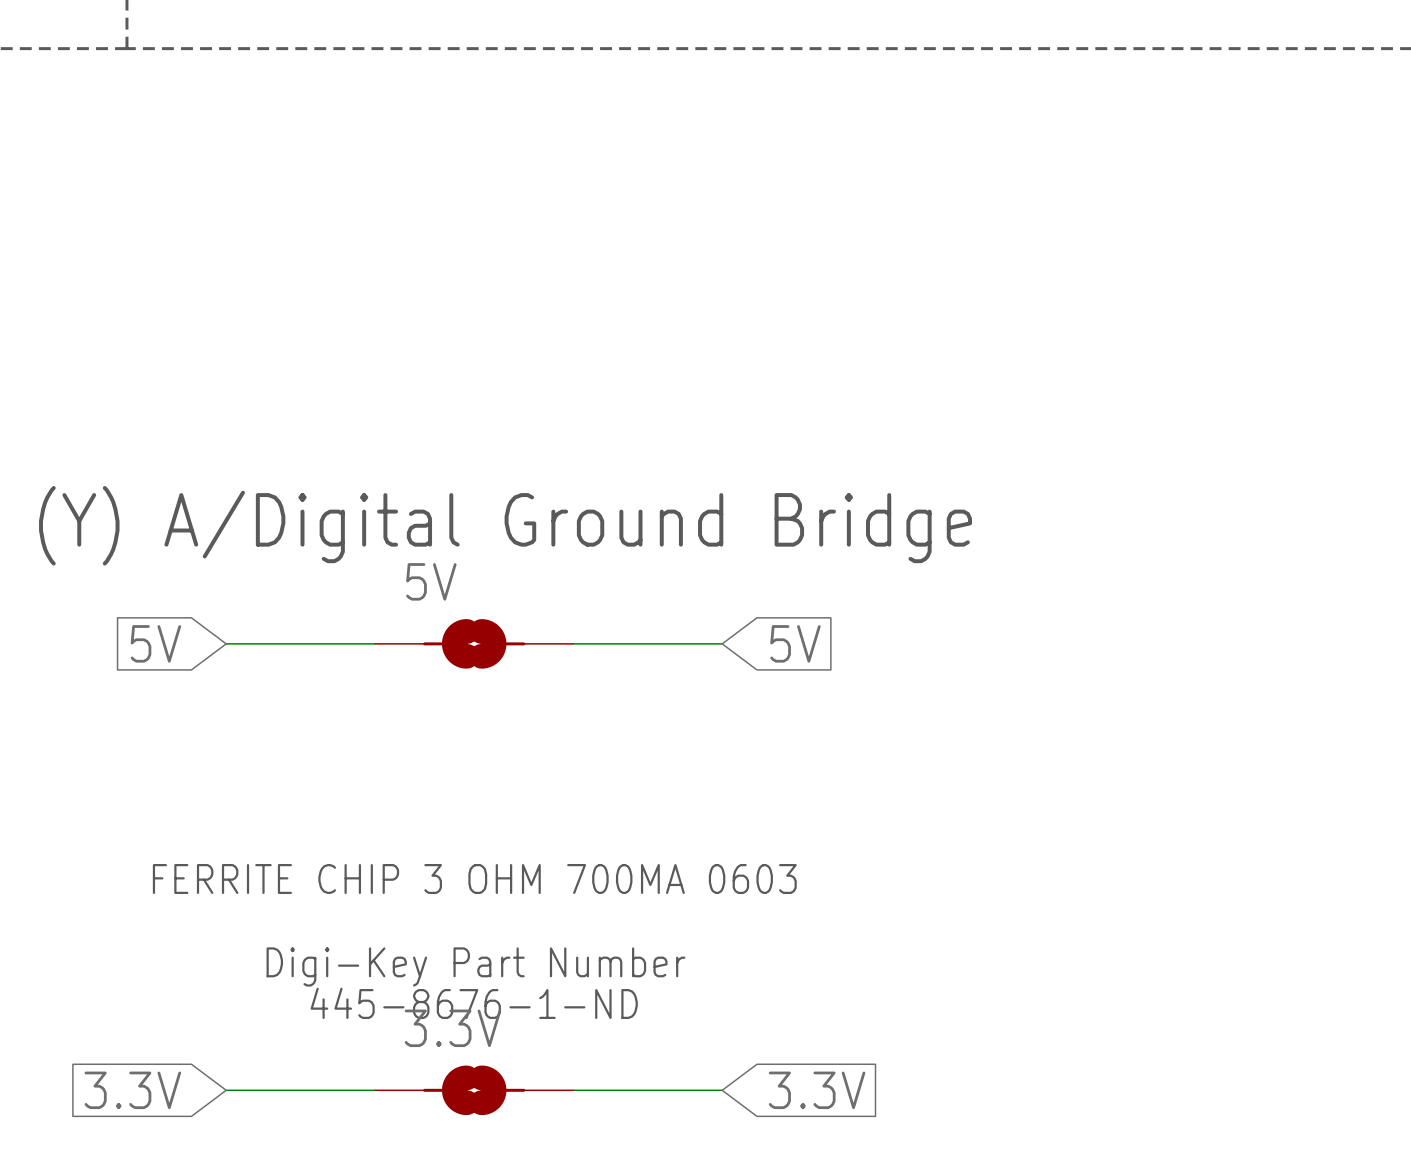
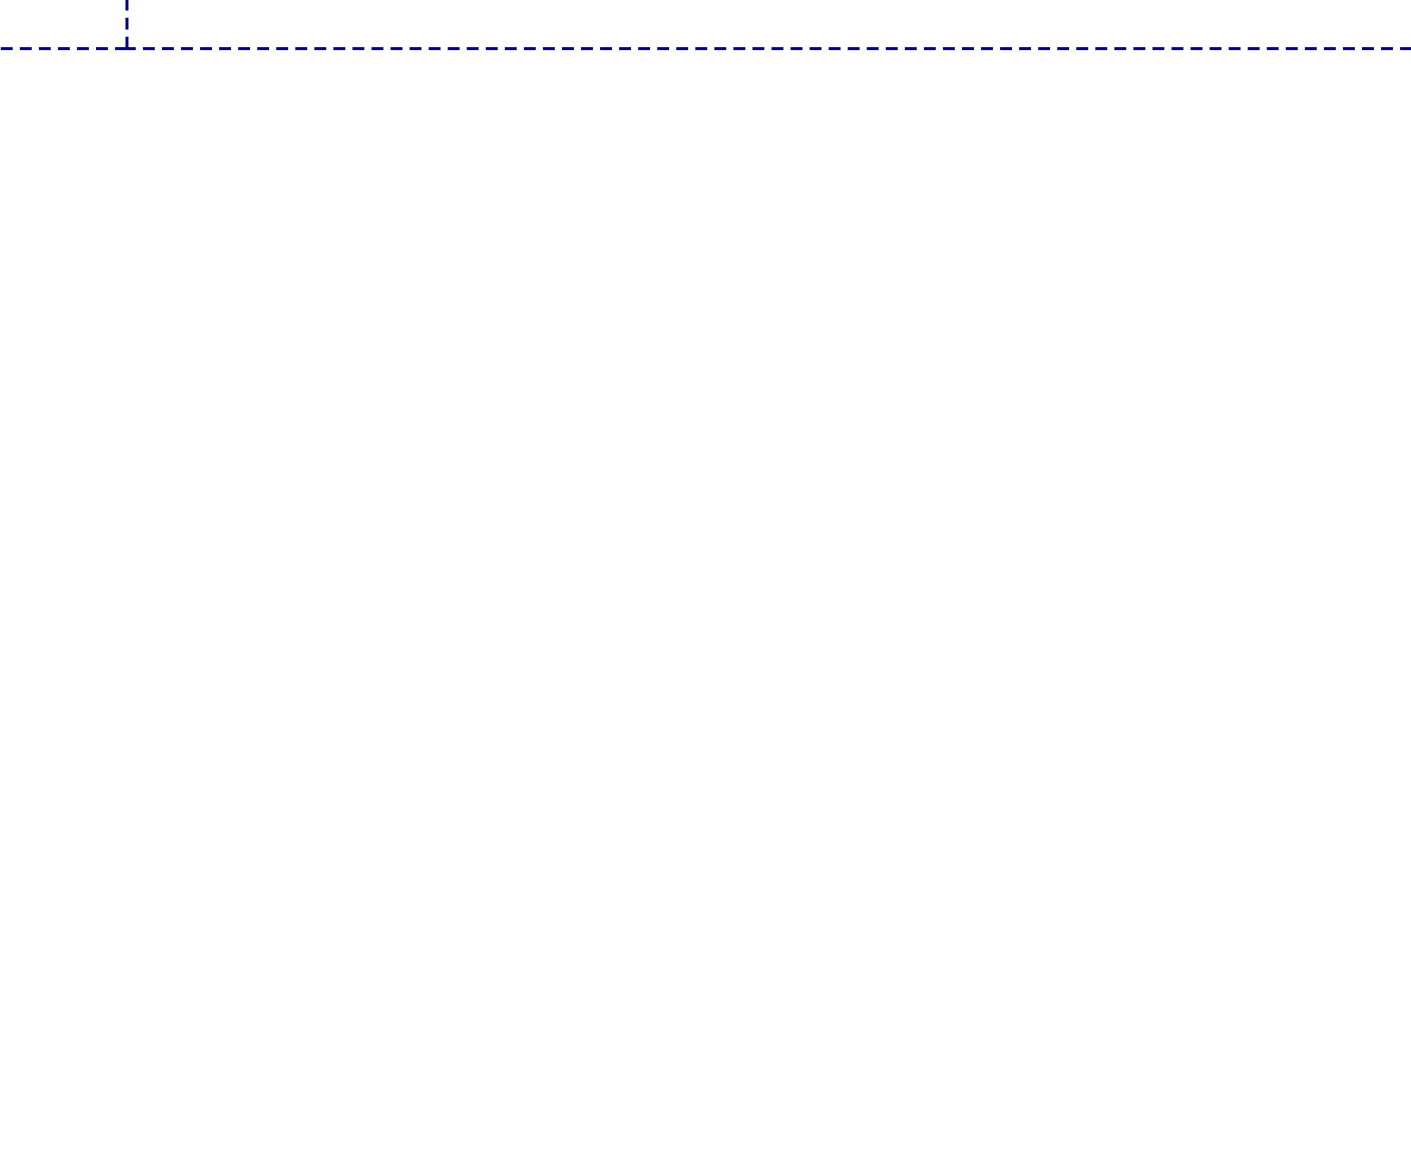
text: (Y) A/Digital Ground Bridge (505, 525) -> none
global label: 5V (155, 643) -> none
wire: (226, 643) (374, 643) -> none
5V: (474, 643) -> none
wire: (573, 643) (722, 643) -> none
global label: 5V (795, 643) -> none
text: FERRITE CHIP 3 OHM 700MA 0603 (474, 879) -> none
text: Digi-Key Part Number (475, 966) -> none
text: 445-8676-1-ND (474, 1003) -> none
global label: 3.3V (132, 1090) -> none
wire: (226, 1090) (374, 1090) -> none
3.3V: (474, 1090) -> none
wire: (573, 1090) (722, 1090) -> none
global label: 3.3V (817, 1090) -> none

